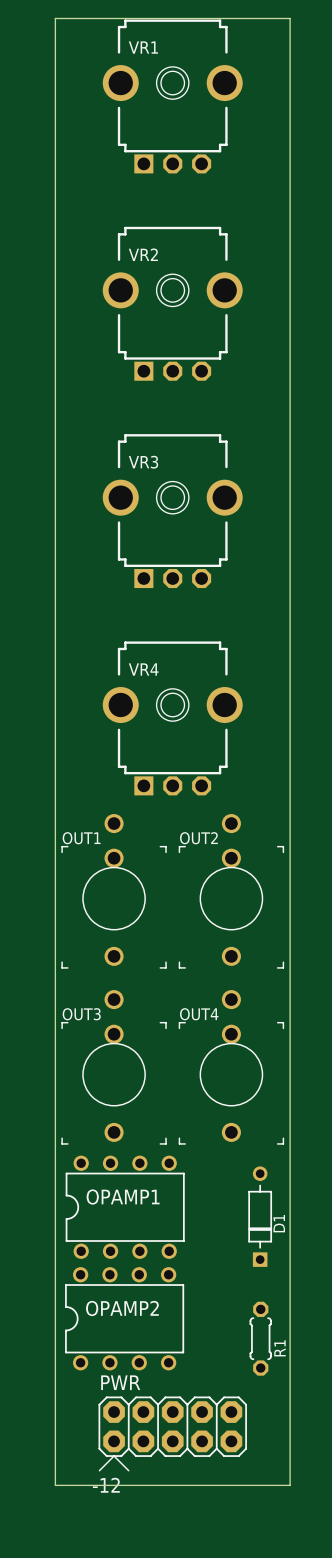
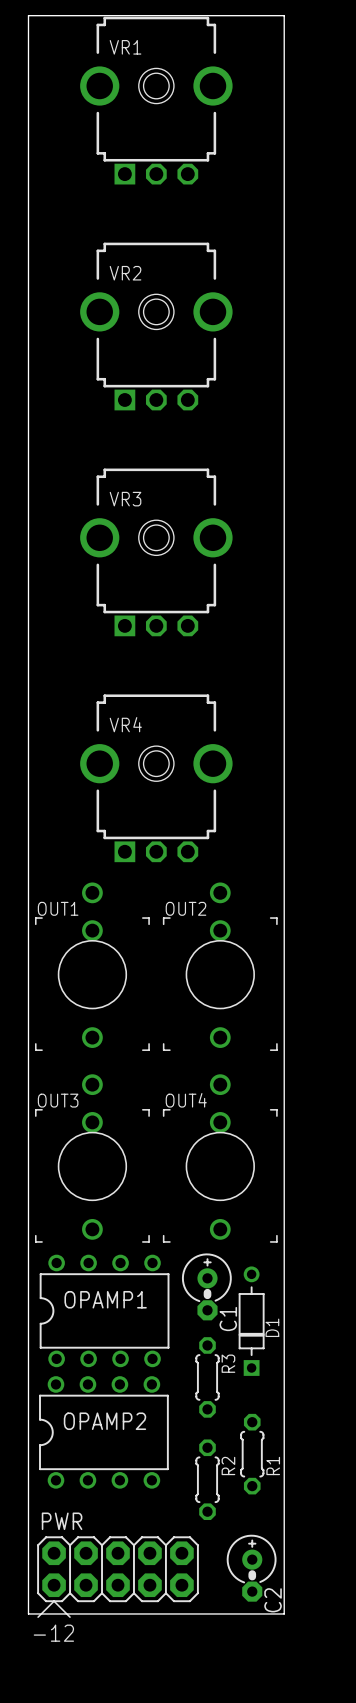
C1: none -> (206, 1286)
R3: none -> (207, 1377)
R2: none -> (207, 1479)
PWR position: (172, 1433) -> (118, 1577)
C2: none -> (251, 1568)

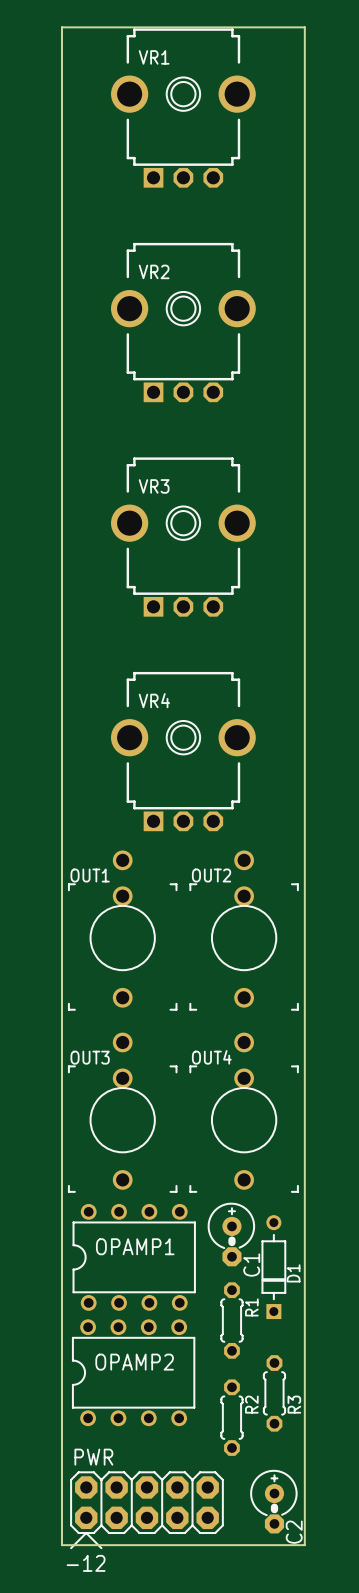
R3 name: R3 (228, 1363) -> R1 (251, 1307)
R1 name: R1 (273, 1465) -> R3 (294, 1404)

